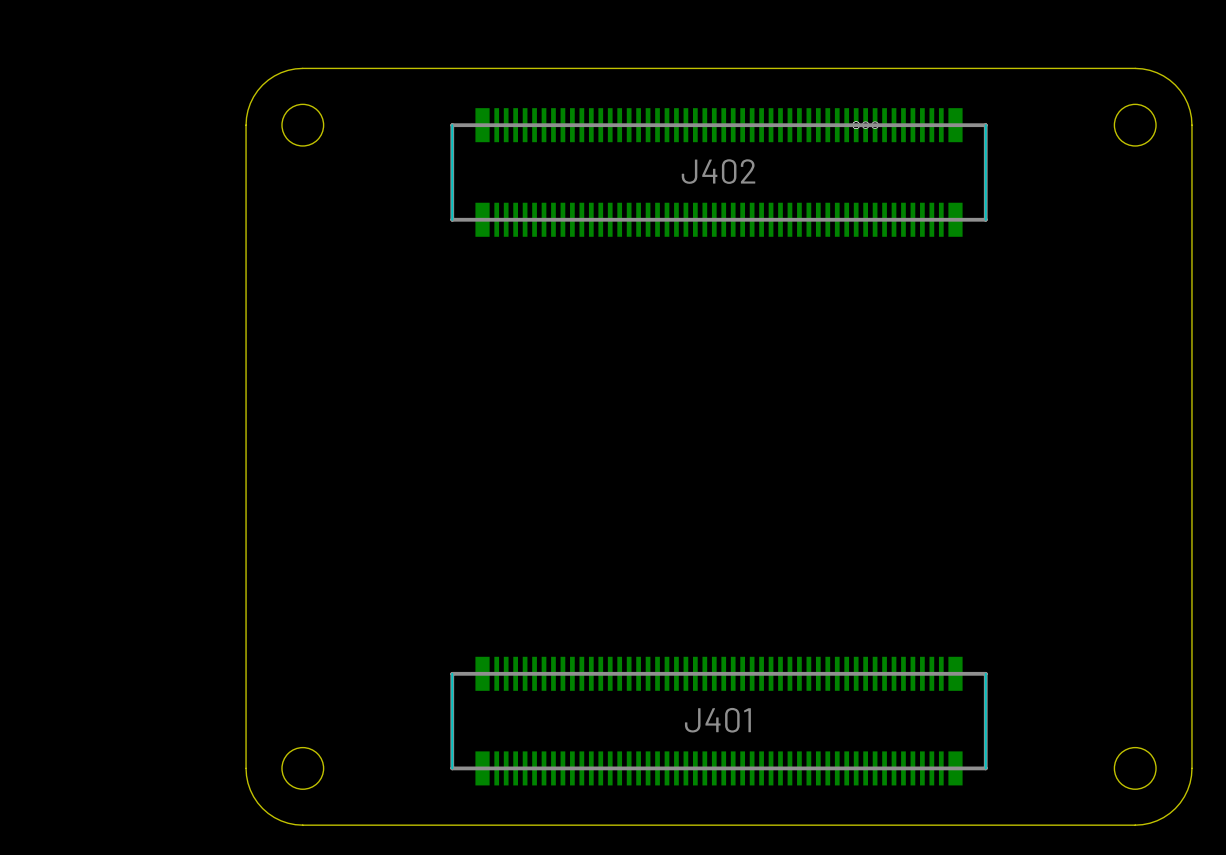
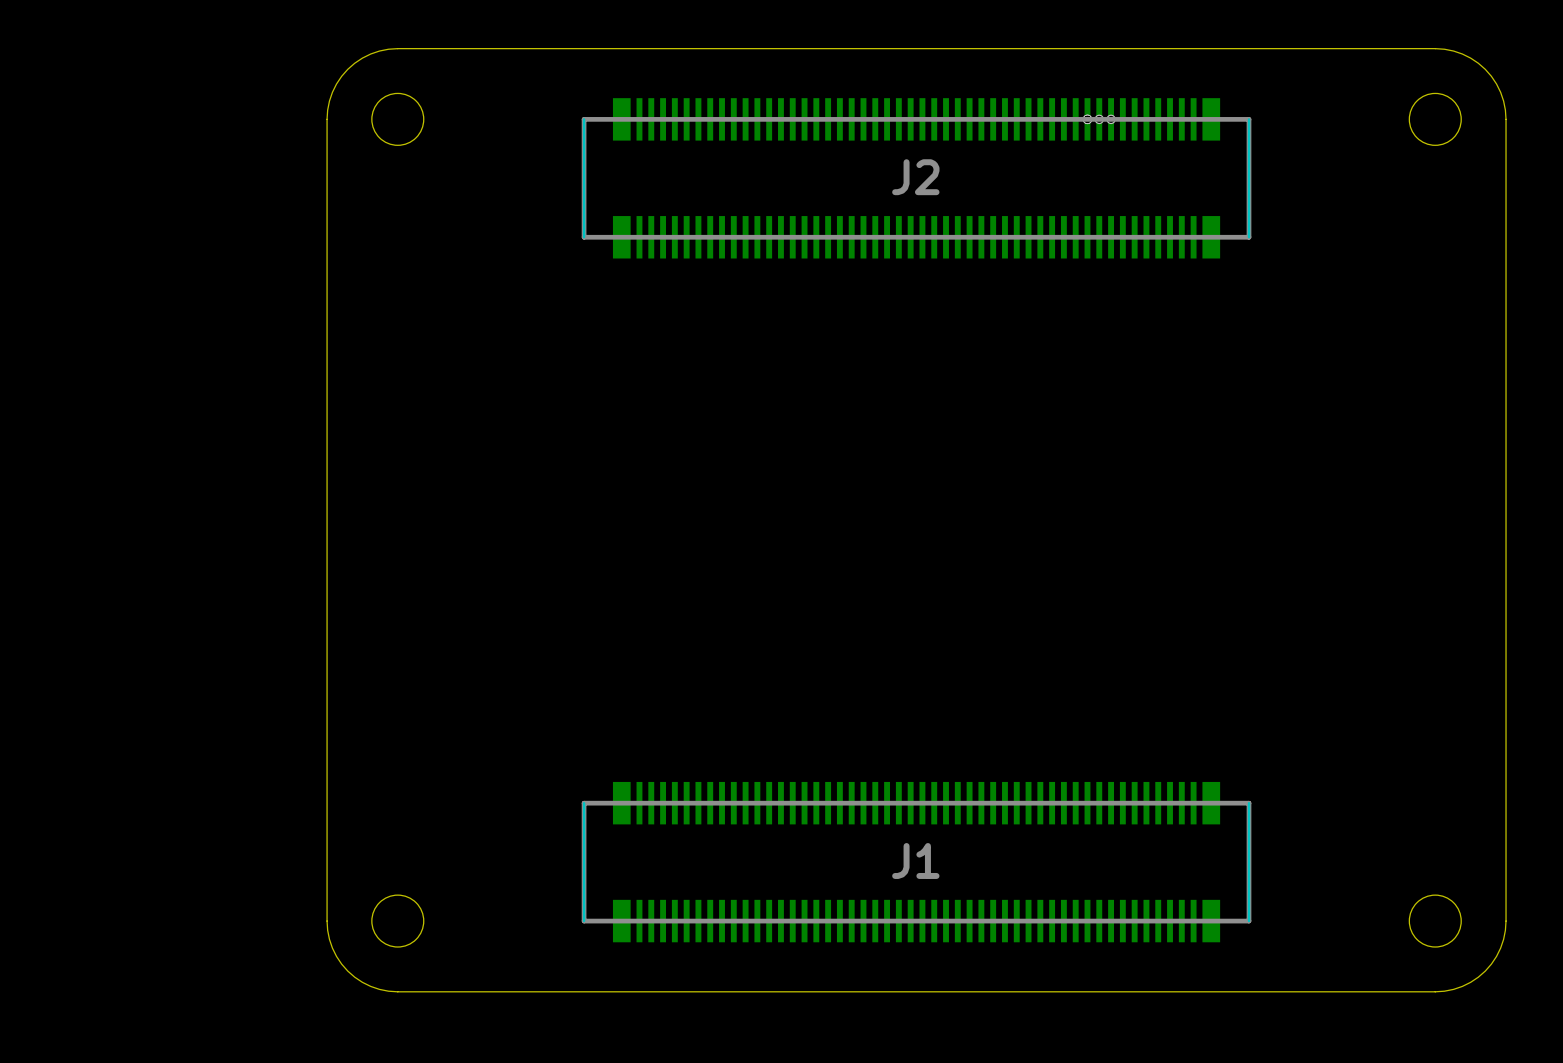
J402 name: J402 (718, 171) -> J2 (915, 177)
J401 name: J401 (717, 720) -> J1 (915, 861)

